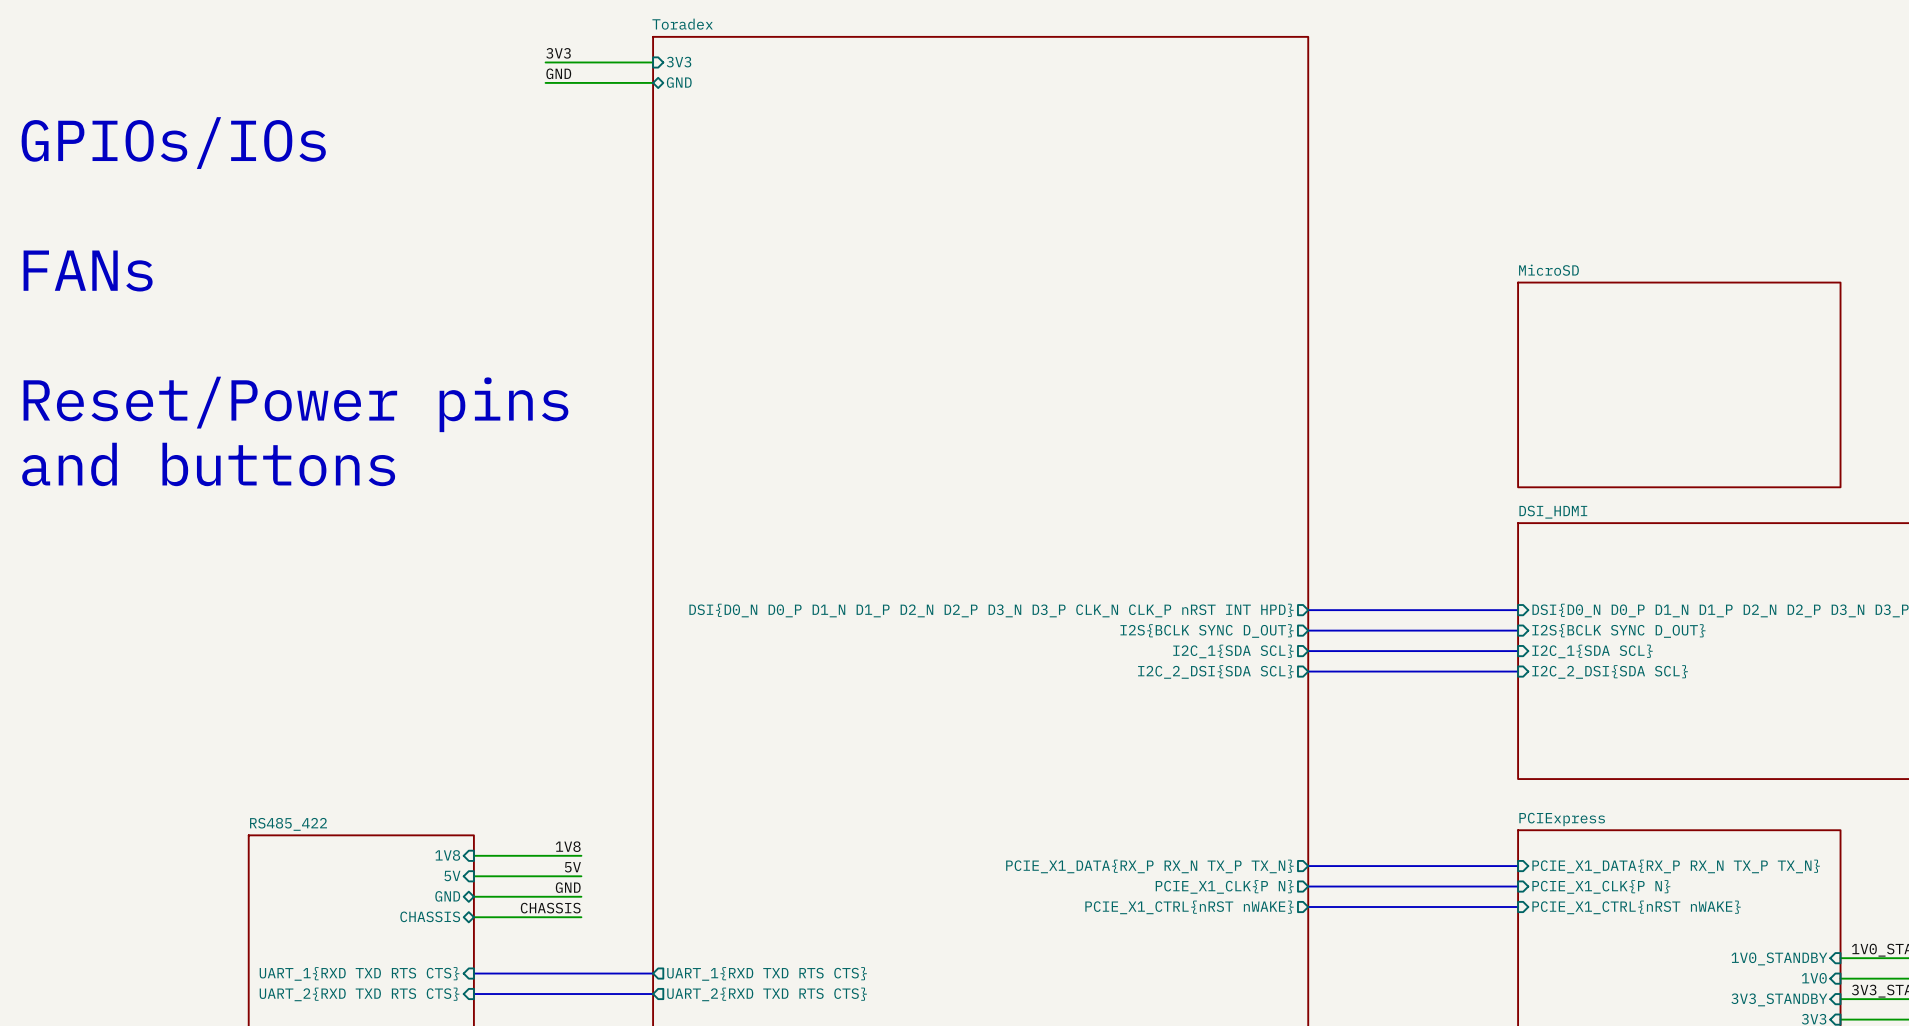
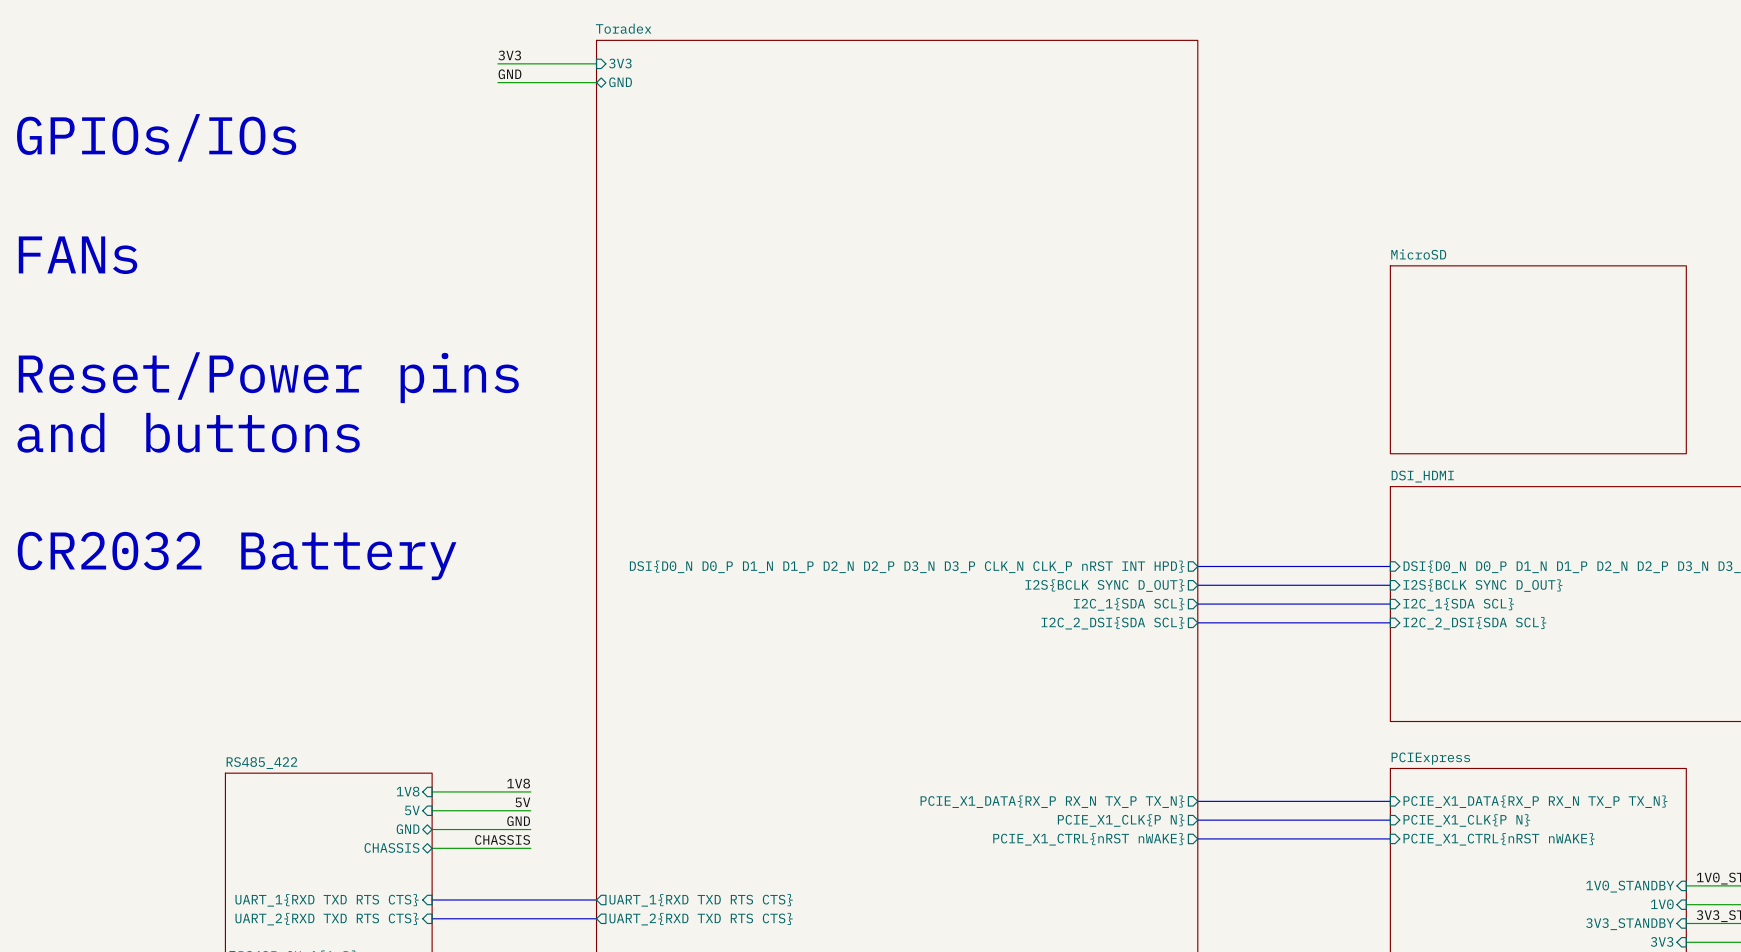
text: none -> CR2032 Battery (237, 555)

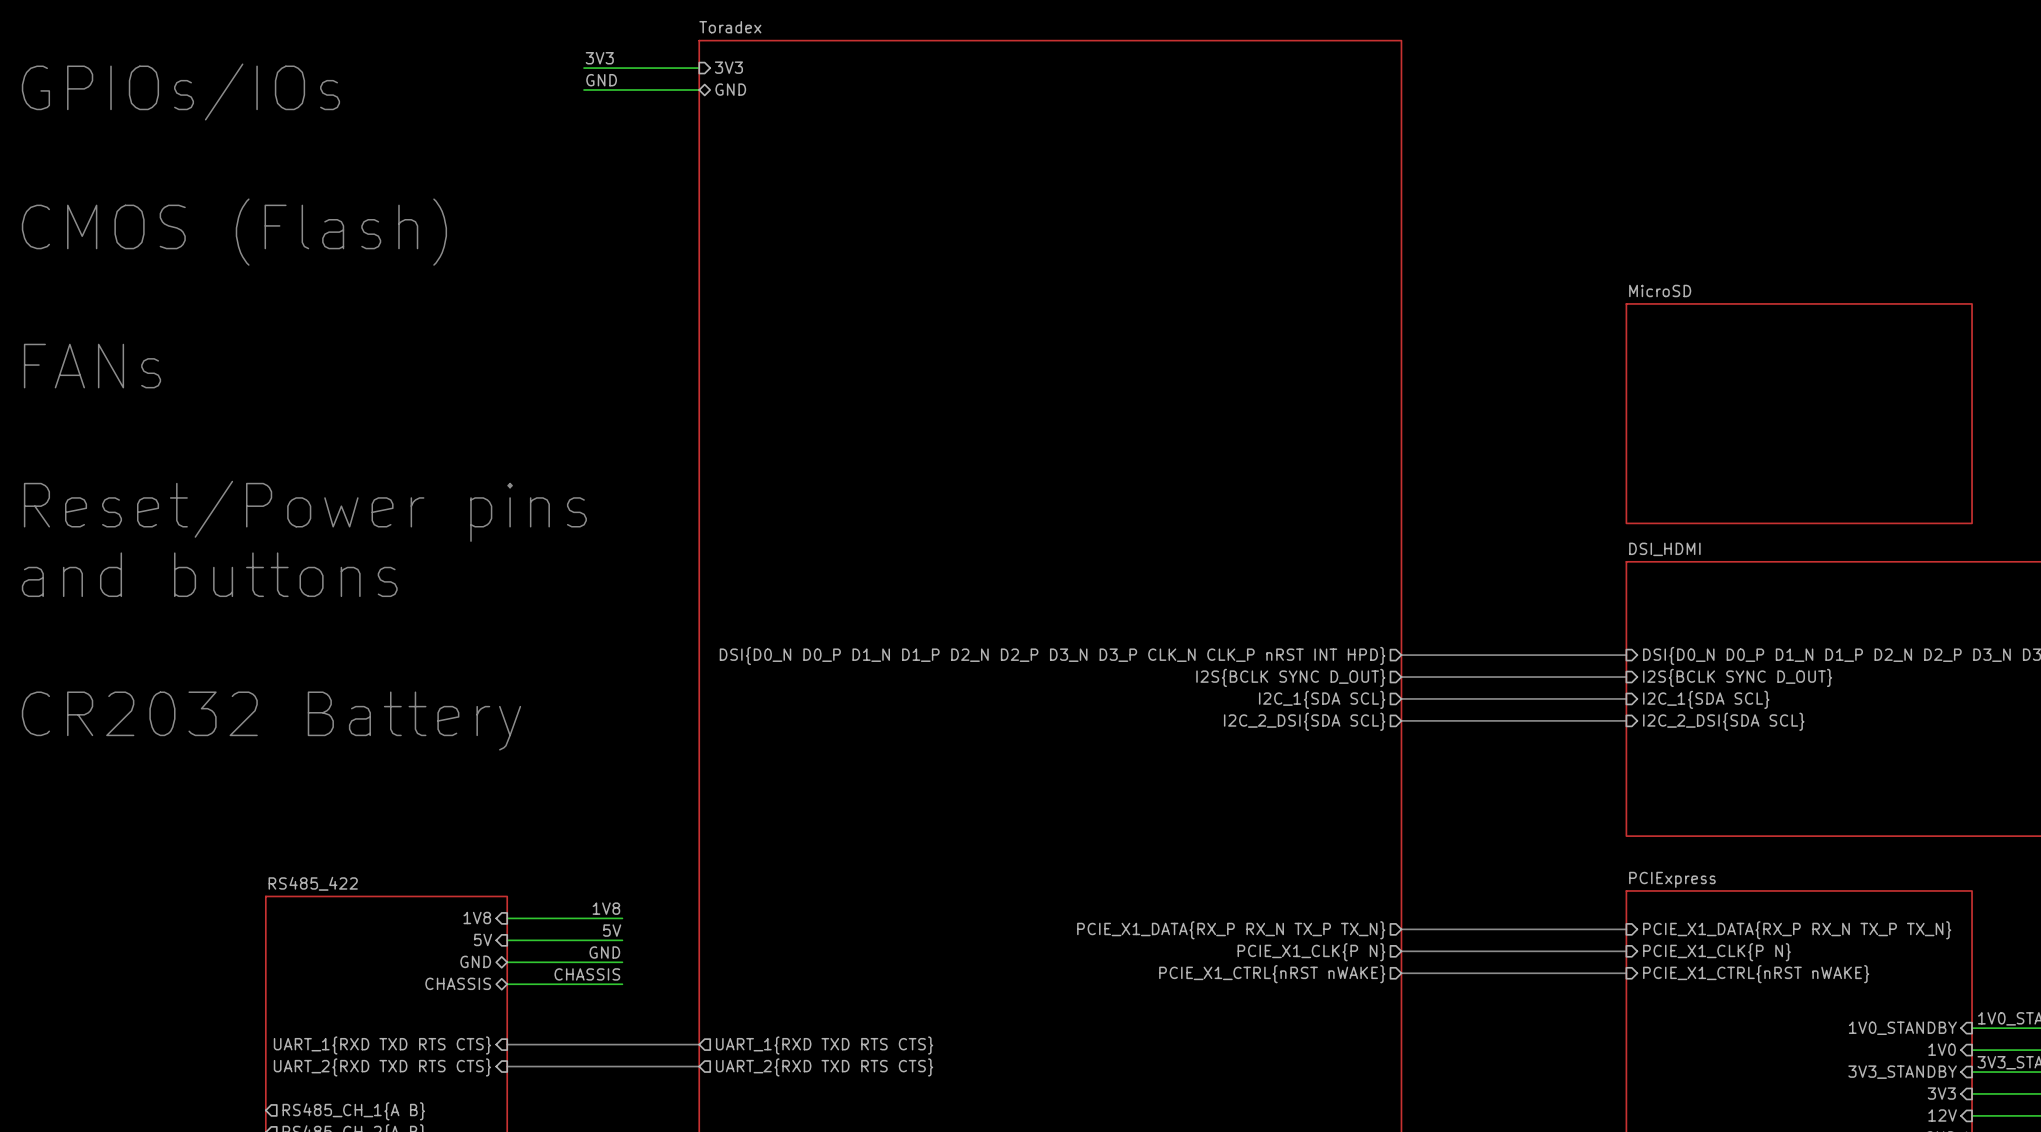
text position: GPIOs/IOs (156, 137) -> GPIOs/IOs (180, 91)
text: none -> CMOS (Flash) (234, 232)
text position: FANs (78, 255) -> FANs (92, 366)
text position: Reset/Power pins (268, 377) -> Reset/Power pins (305, 511)
text position: and buttons (188, 432) -> and buttons (209, 574)
text position: CR2032 Battery (237, 555) -> CR2032 Battery (271, 721)

